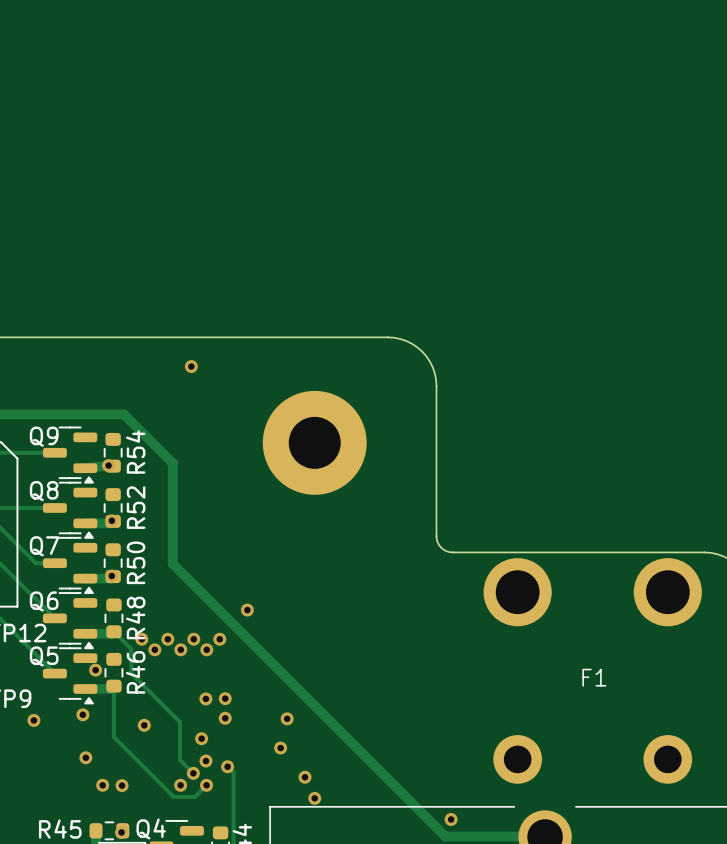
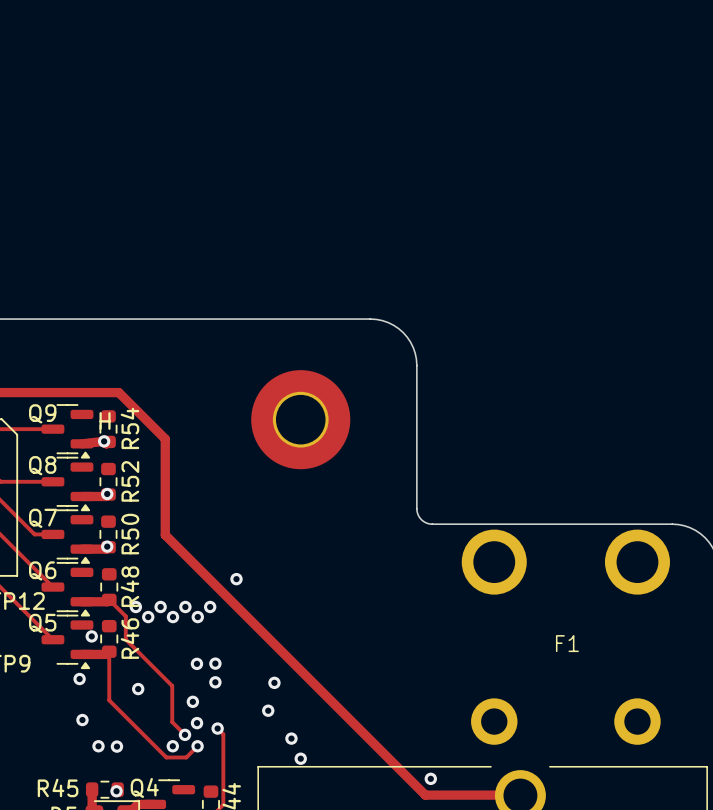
via: (191, 366) -> none
text: none -> H (105, 420)
via: (33, 720) -> none

